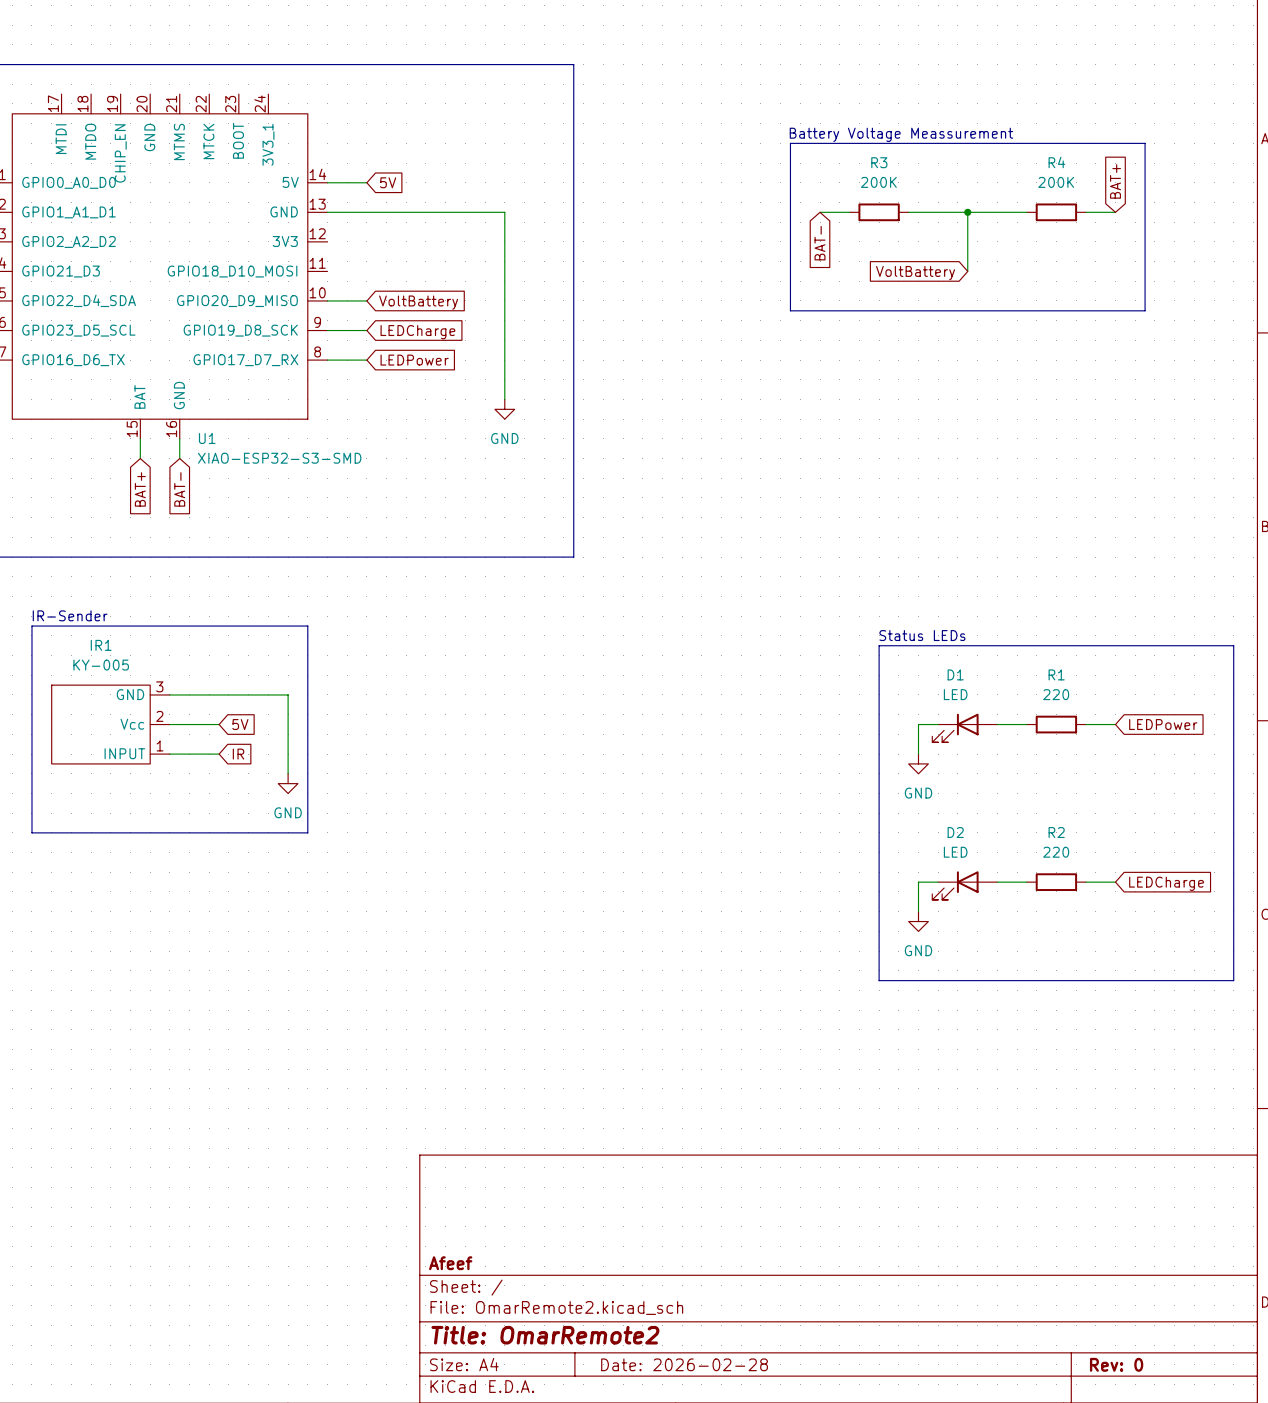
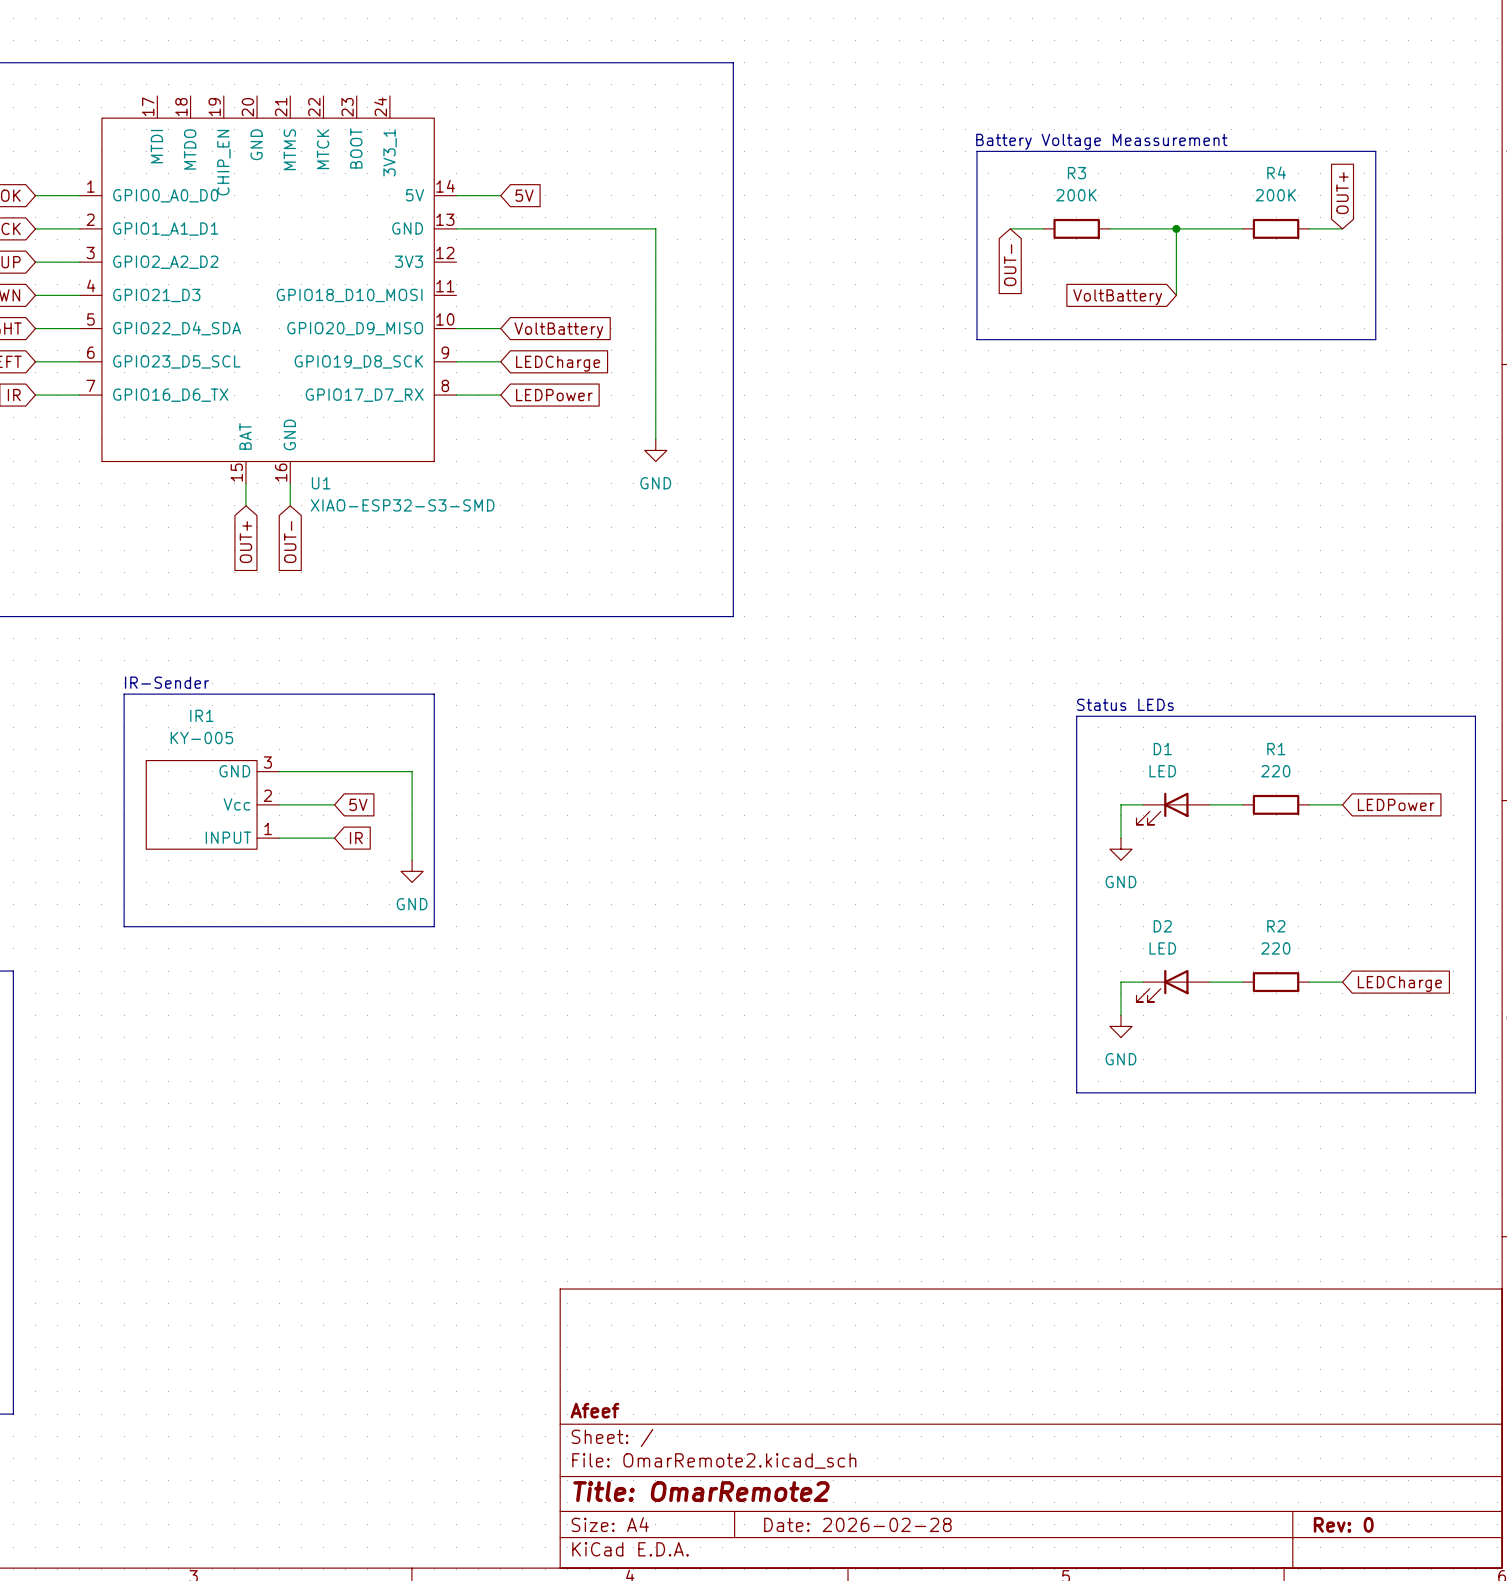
global label: BAT+ (1115, 181) -> OUT+ (1342, 193)
global label: BAT- (820, 243) -> OUT- (1010, 265)
global label: BAT+ (140, 489) -> OUT+ (245, 542)
global label: BAT- (179, 489) -> OUT- (290, 542)

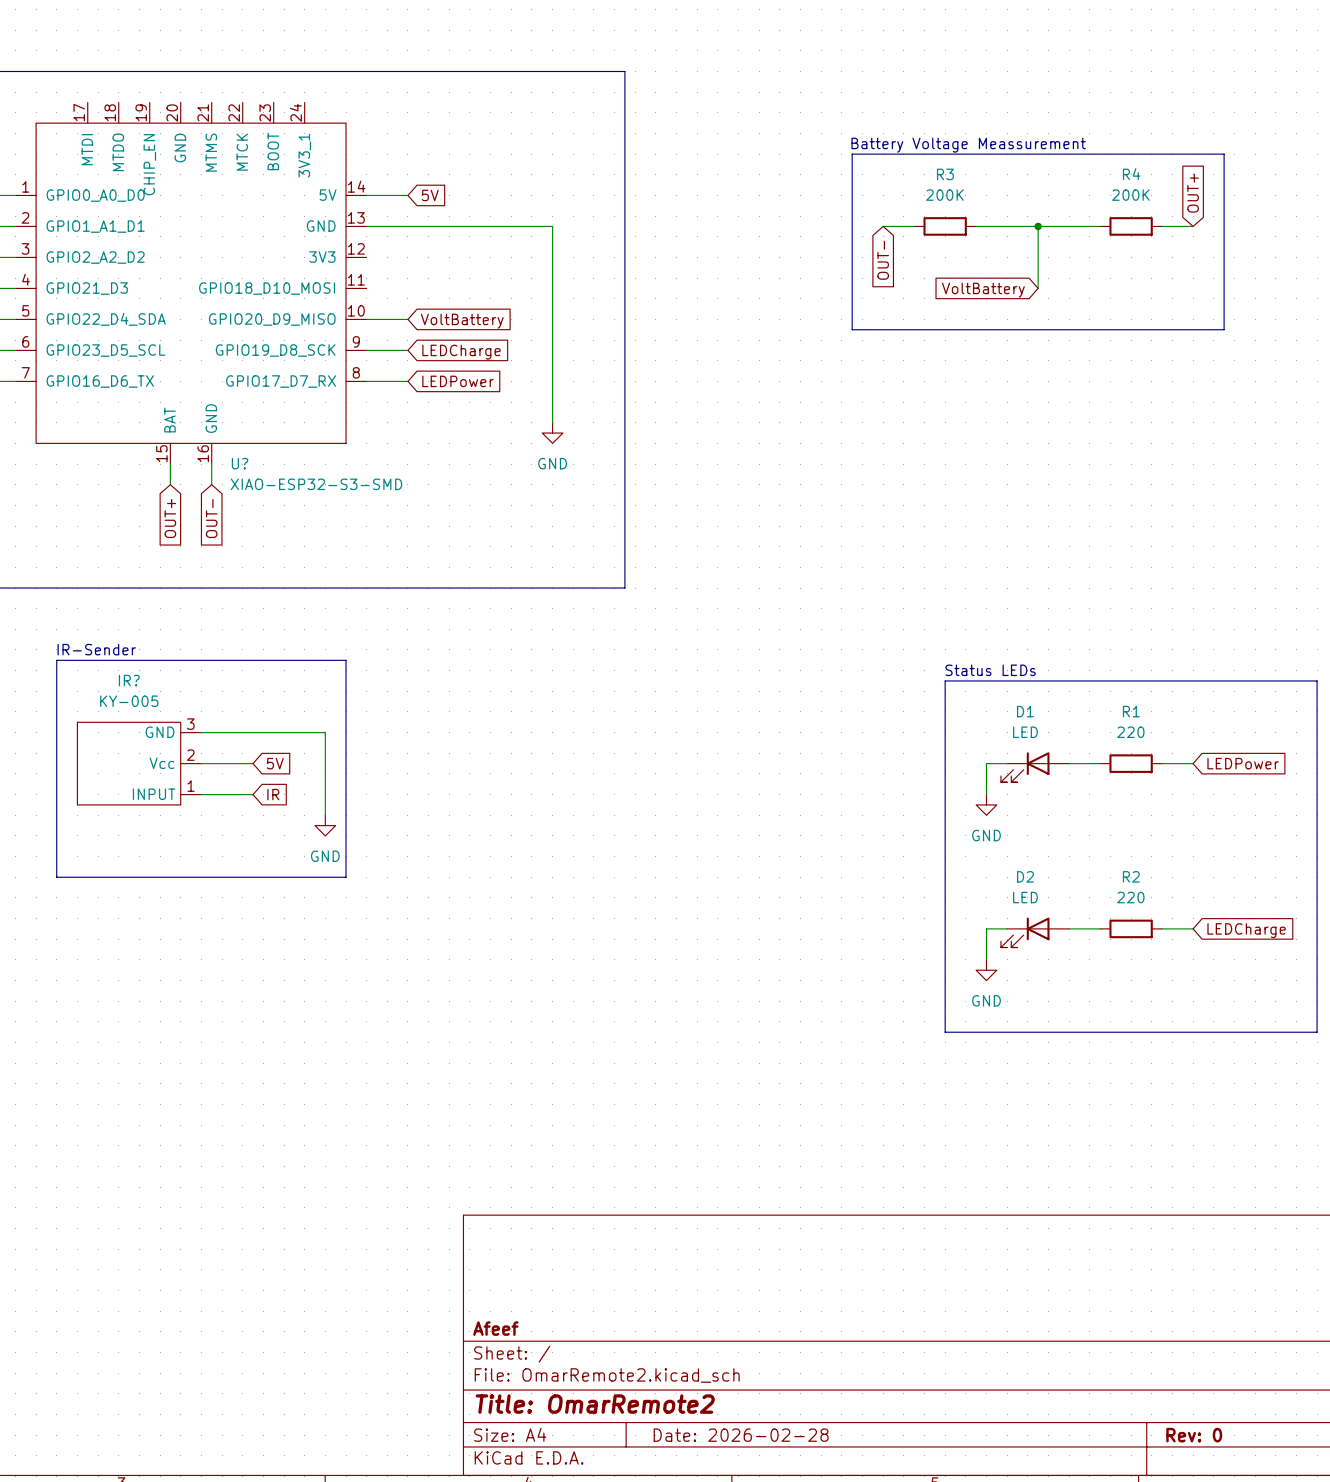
U1 name: U1 (321, 483) -> U? (240, 463)
IR1 name: IR1 (201, 715) -> IR? (129, 680)

